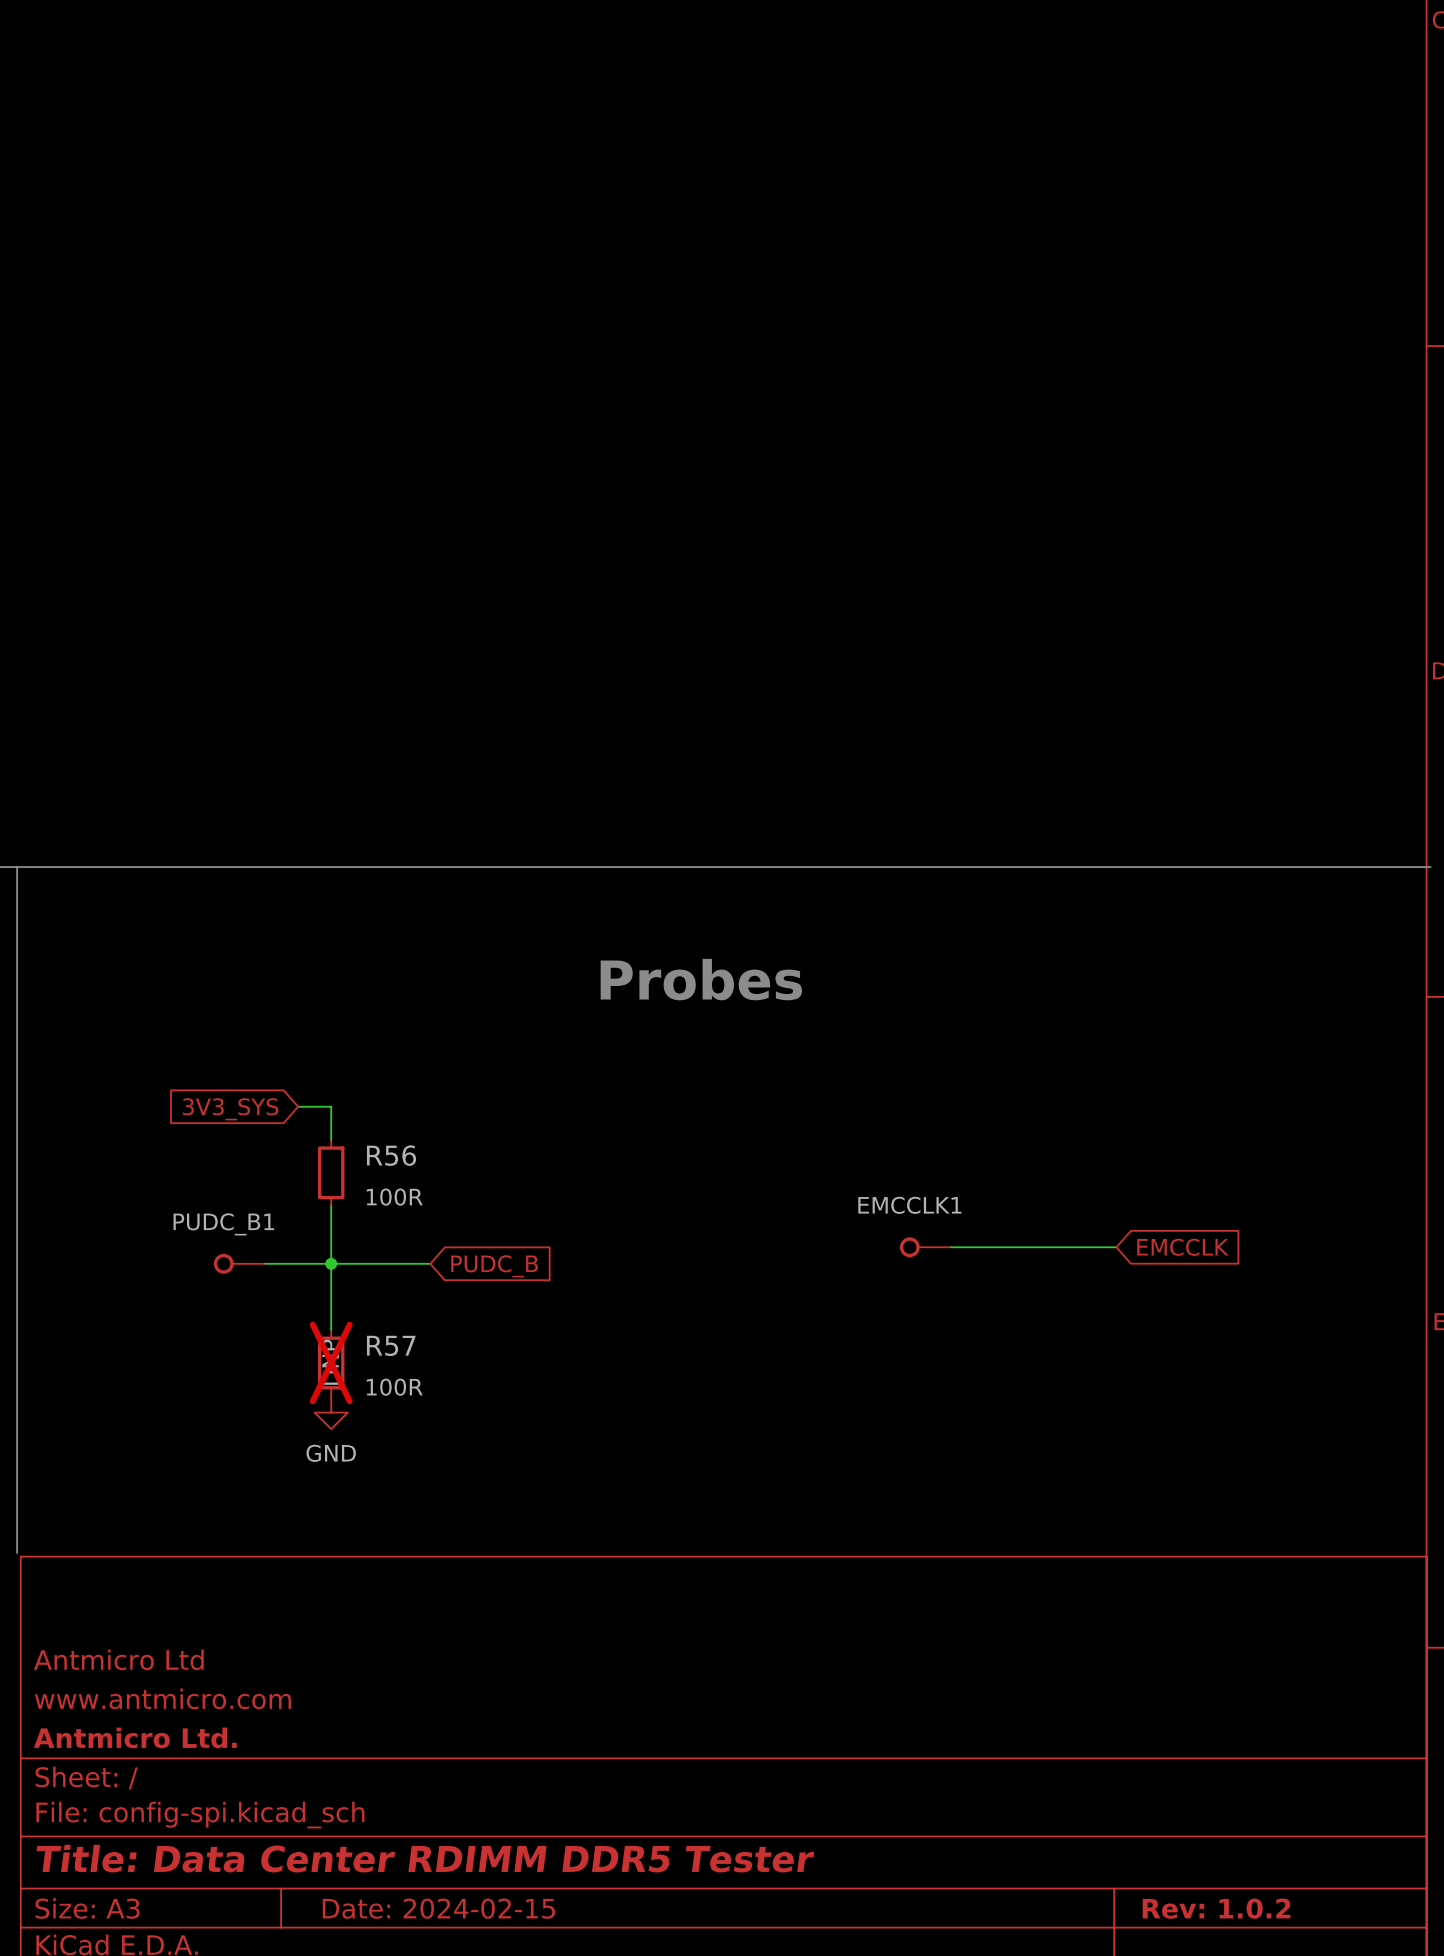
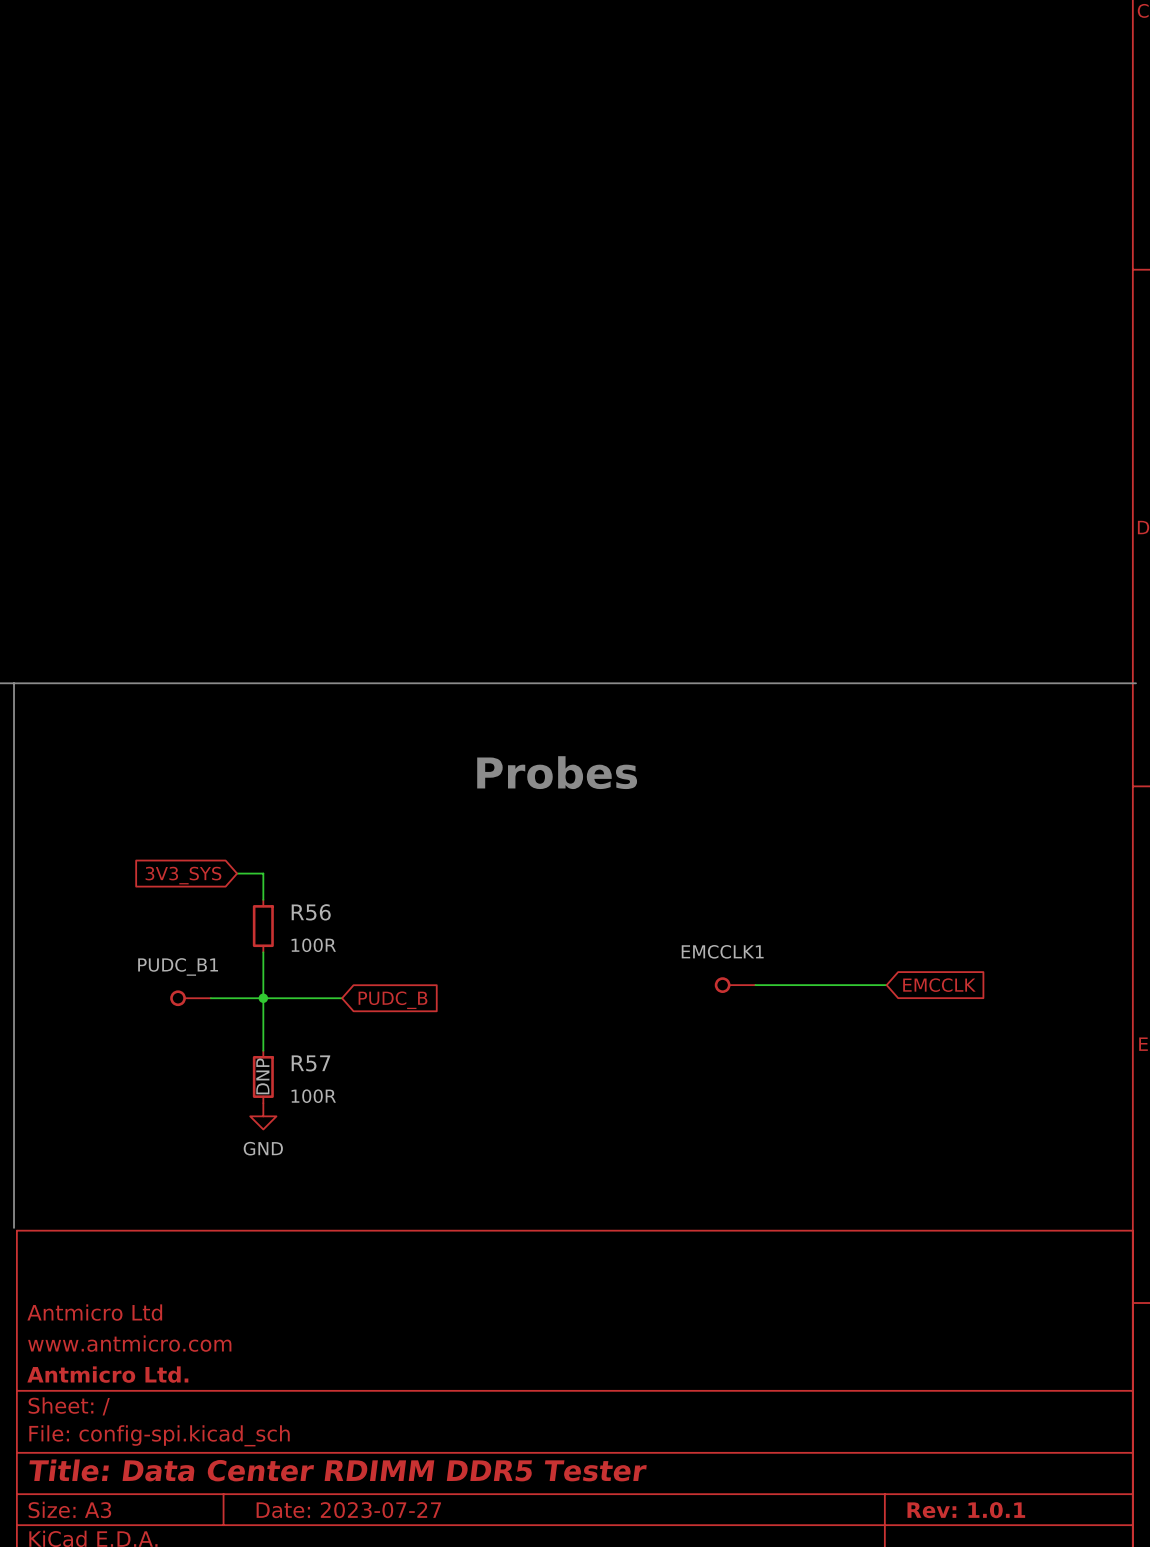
R57 do-not-place cross: (331, 1362) -> none
title block: Date: 2024-02-15 (438, 1908) -> Date: 2023-07-27 (348, 1510)
title block: Rev: 1.0.2 (1216, 1908) -> Rev: 1.0.1 (966, 1510)

